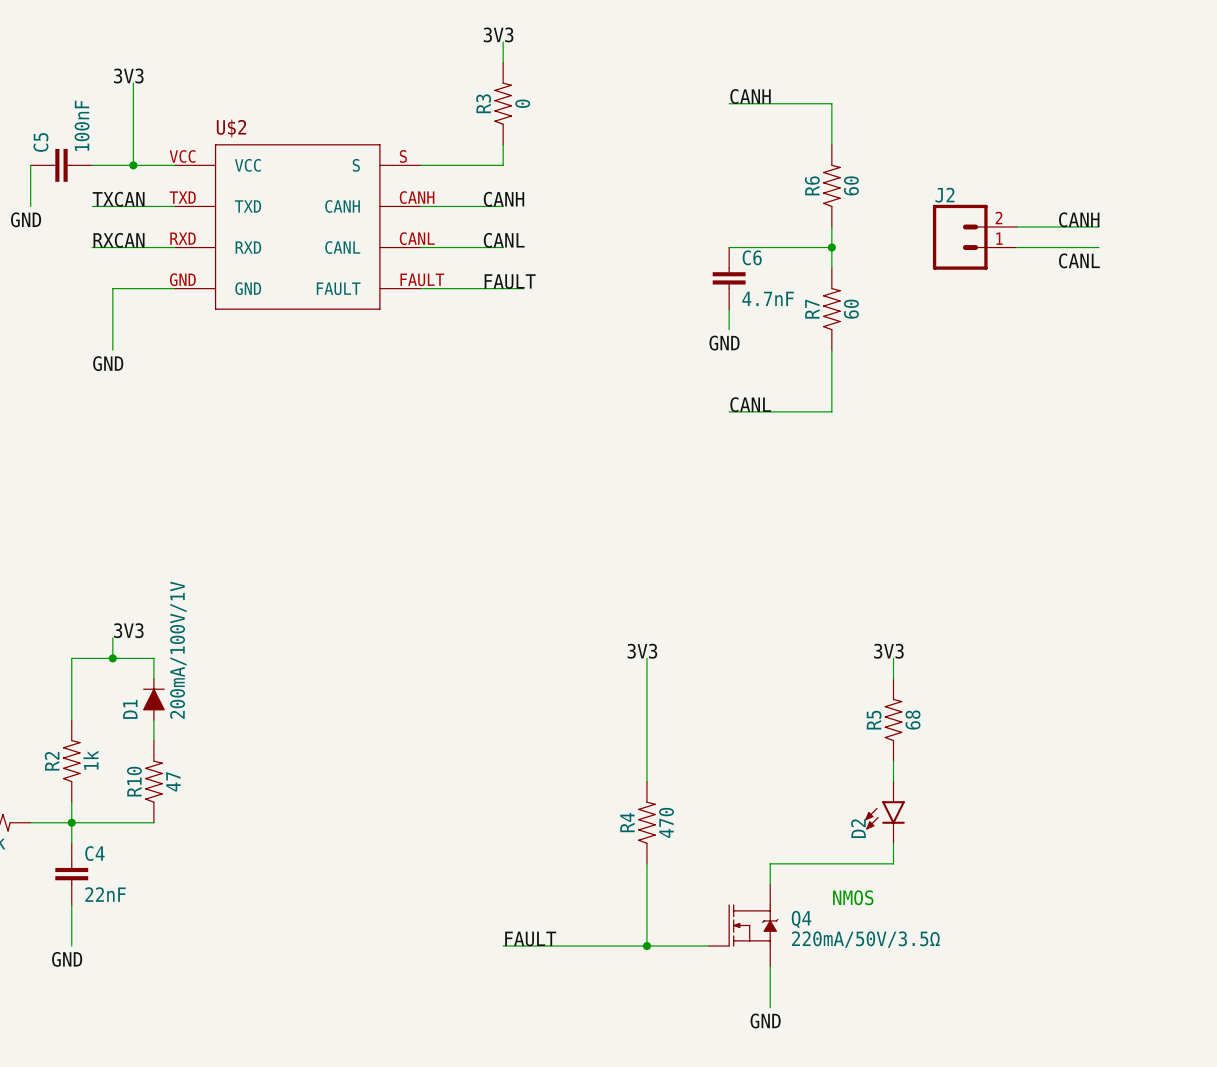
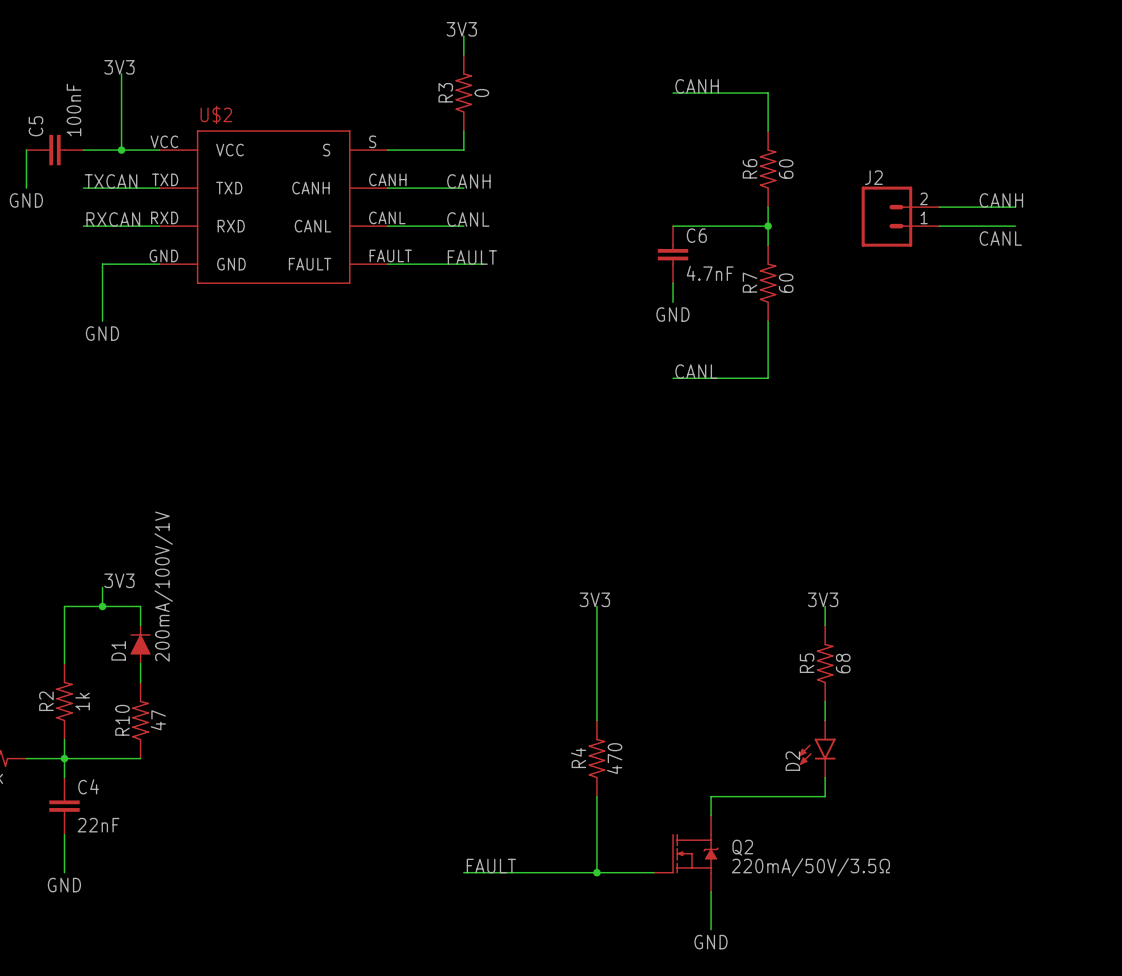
text: NMOS (853, 897) -> none
Q4 name: Q4 (801, 919) -> Q2 (742, 847)

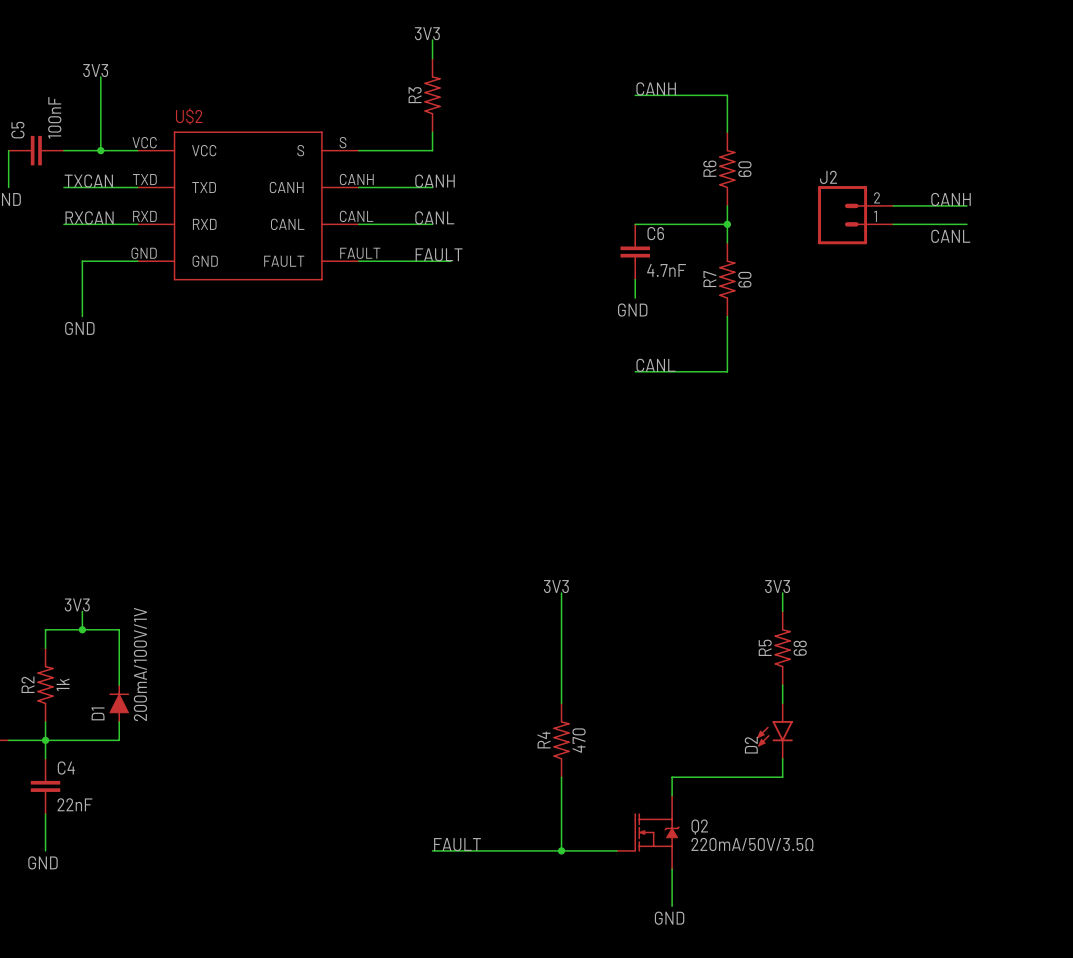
R3 value: 0 (481, 93) -> none
label position: 3V3 (119, 580) -> 3V3 (77, 604)
wire: (102, 587) (102, 606) -> (82, 611) (82, 629)
junction position: (102, 606) -> (82, 629)
wire: (140, 625) (140, 606) (64, 606) (64, 644) -> (119, 648) (119, 629) (45, 629)
D1 position: (140, 644) -> (119, 703)
R10: 47 (140, 720) -> none

